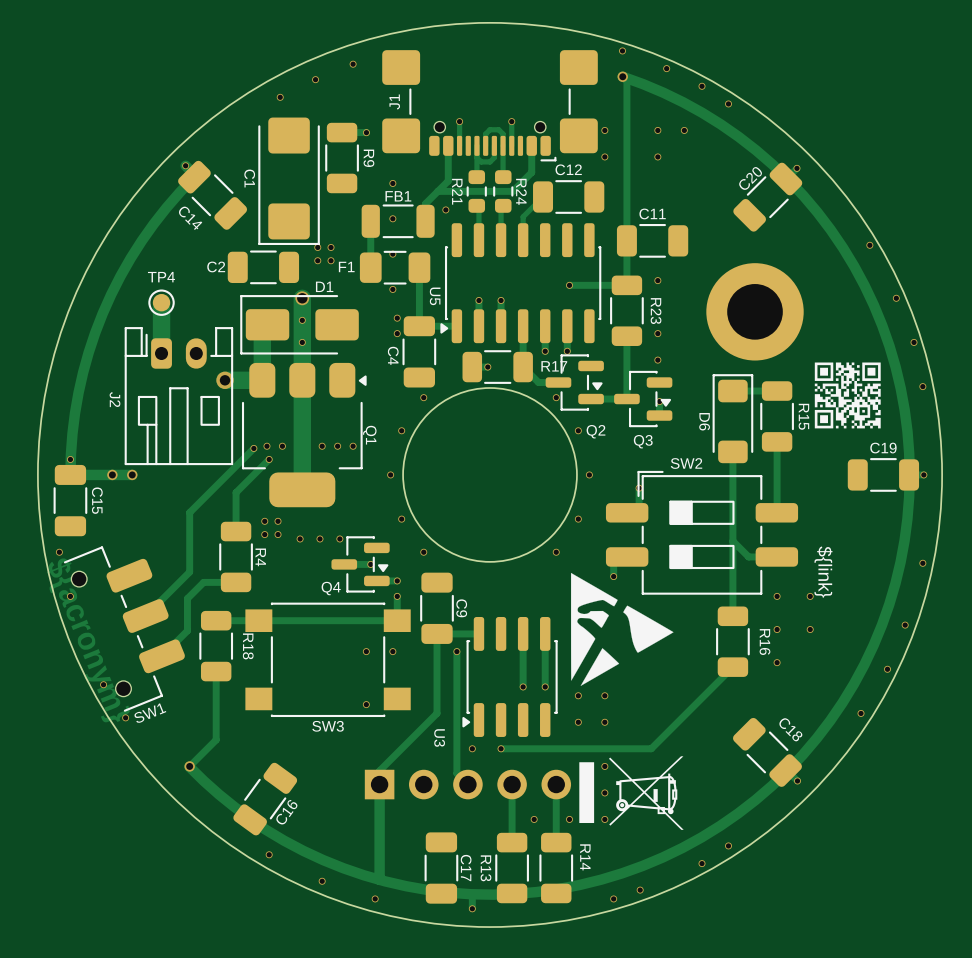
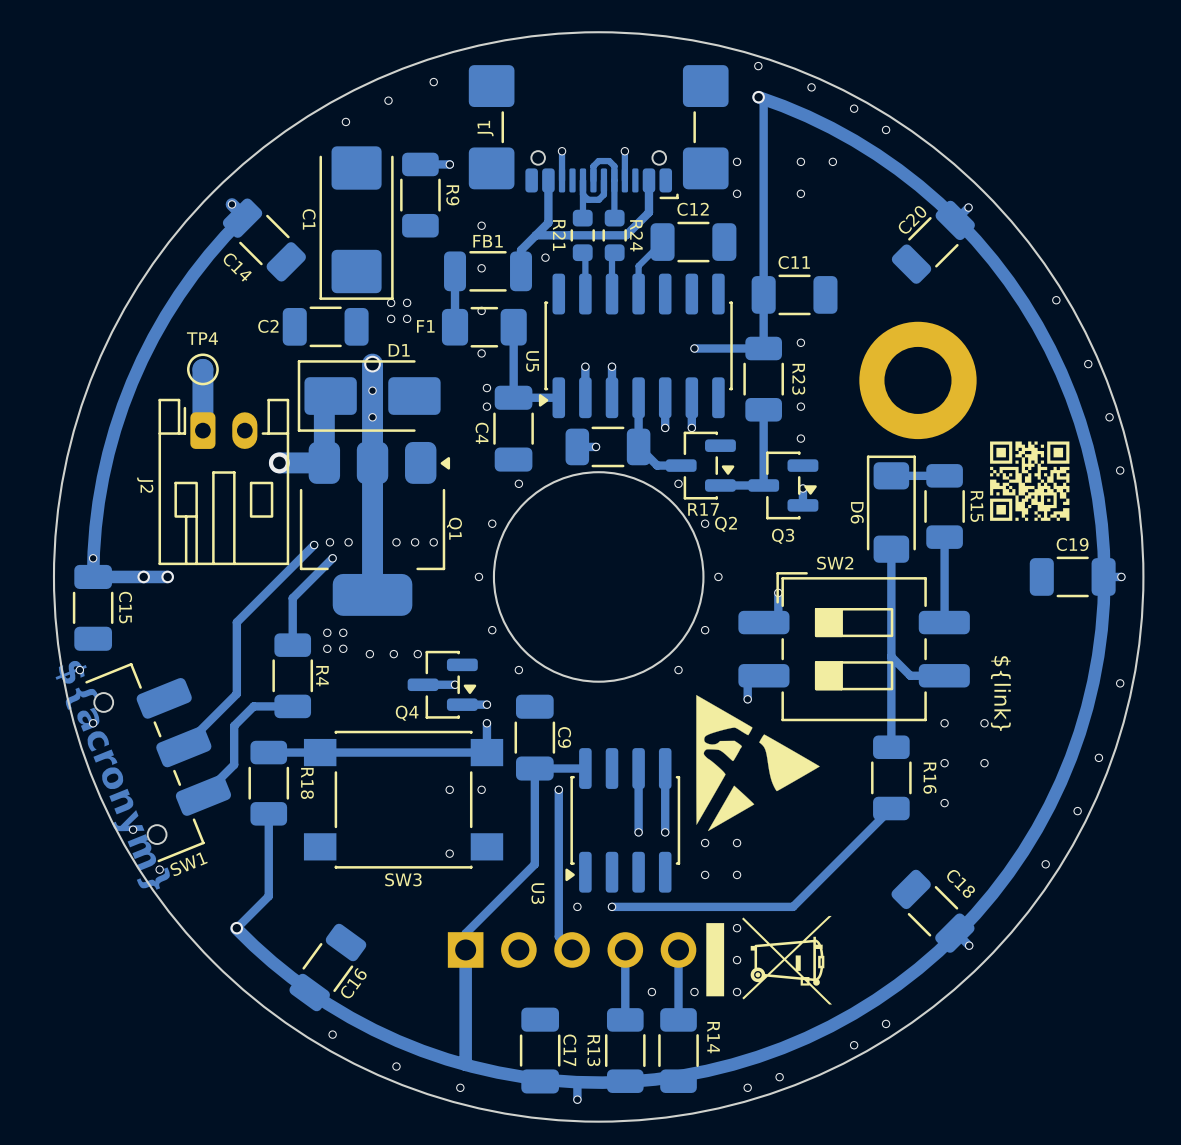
R17 name position: R17 (554, 366) -> R17 (703, 509)

